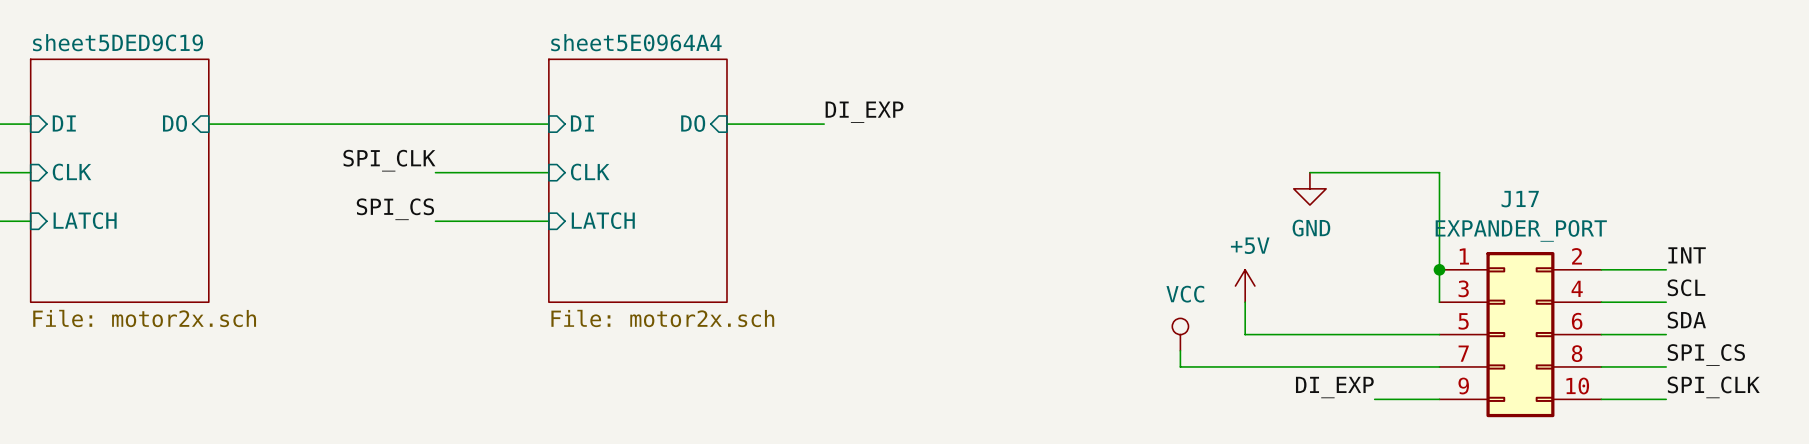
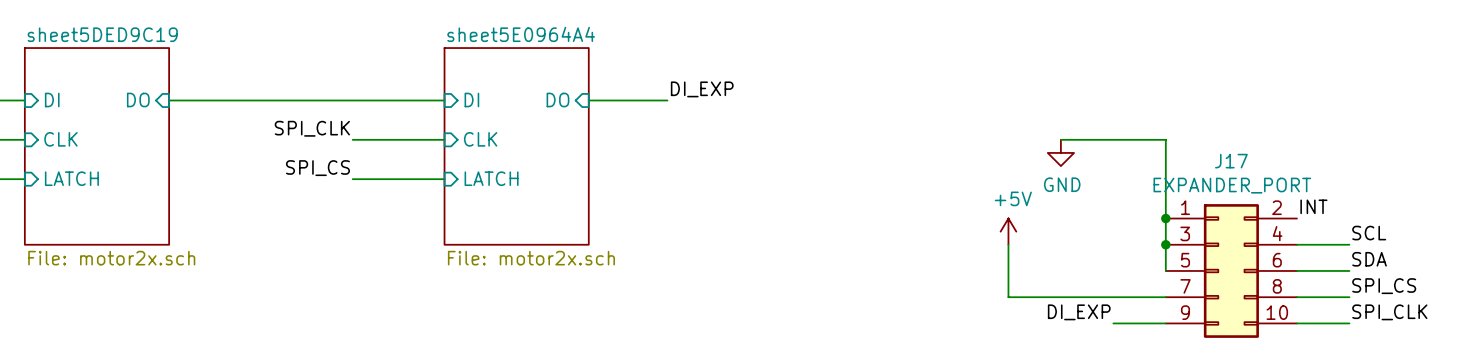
label position: INT (1687, 255) -> INT (1313, 206)
wire: (1601, 269) (1666, 269) -> none
junction: none -> (1165, 244)
power symbol: VCC (1180, 334) -> none
wire: (1245, 334) (1439, 334) -> (1165, 244) (1165, 270)
wire: (1180, 350) (1180, 366) (1245, 366) -> (1008, 270) (1008, 297)

